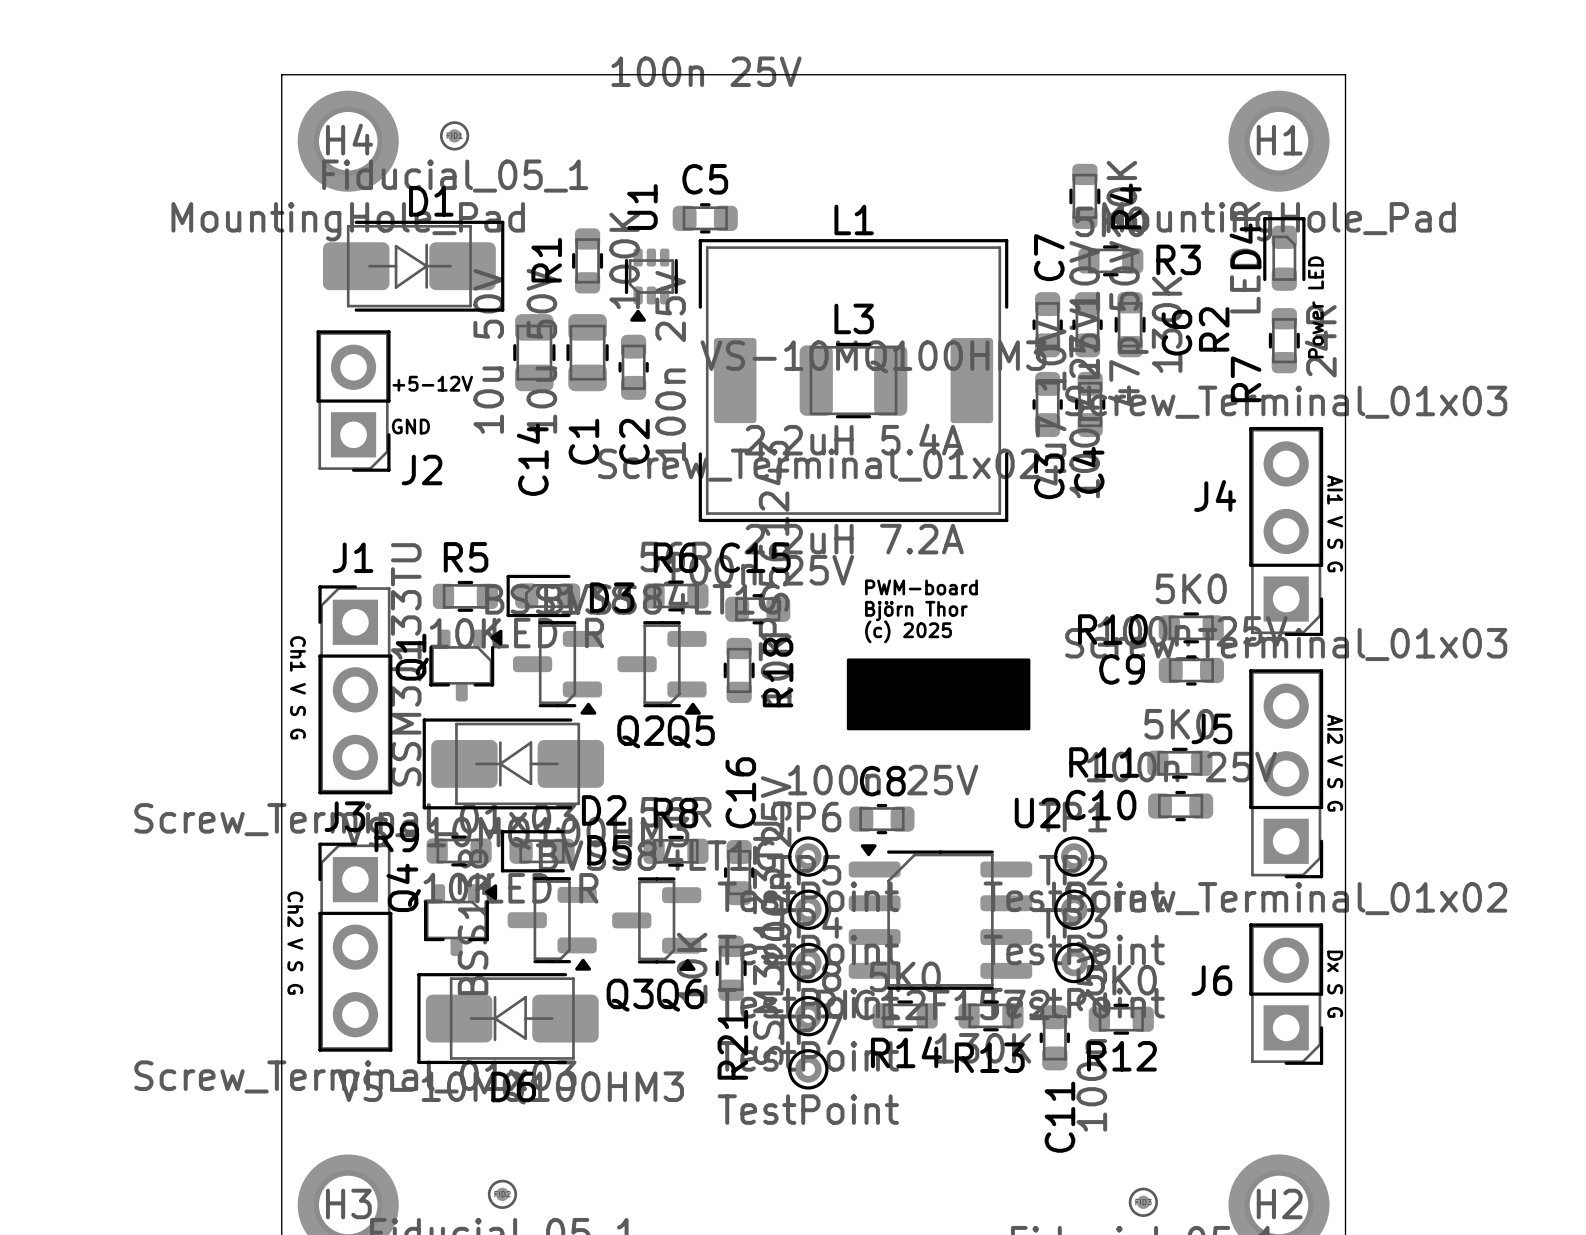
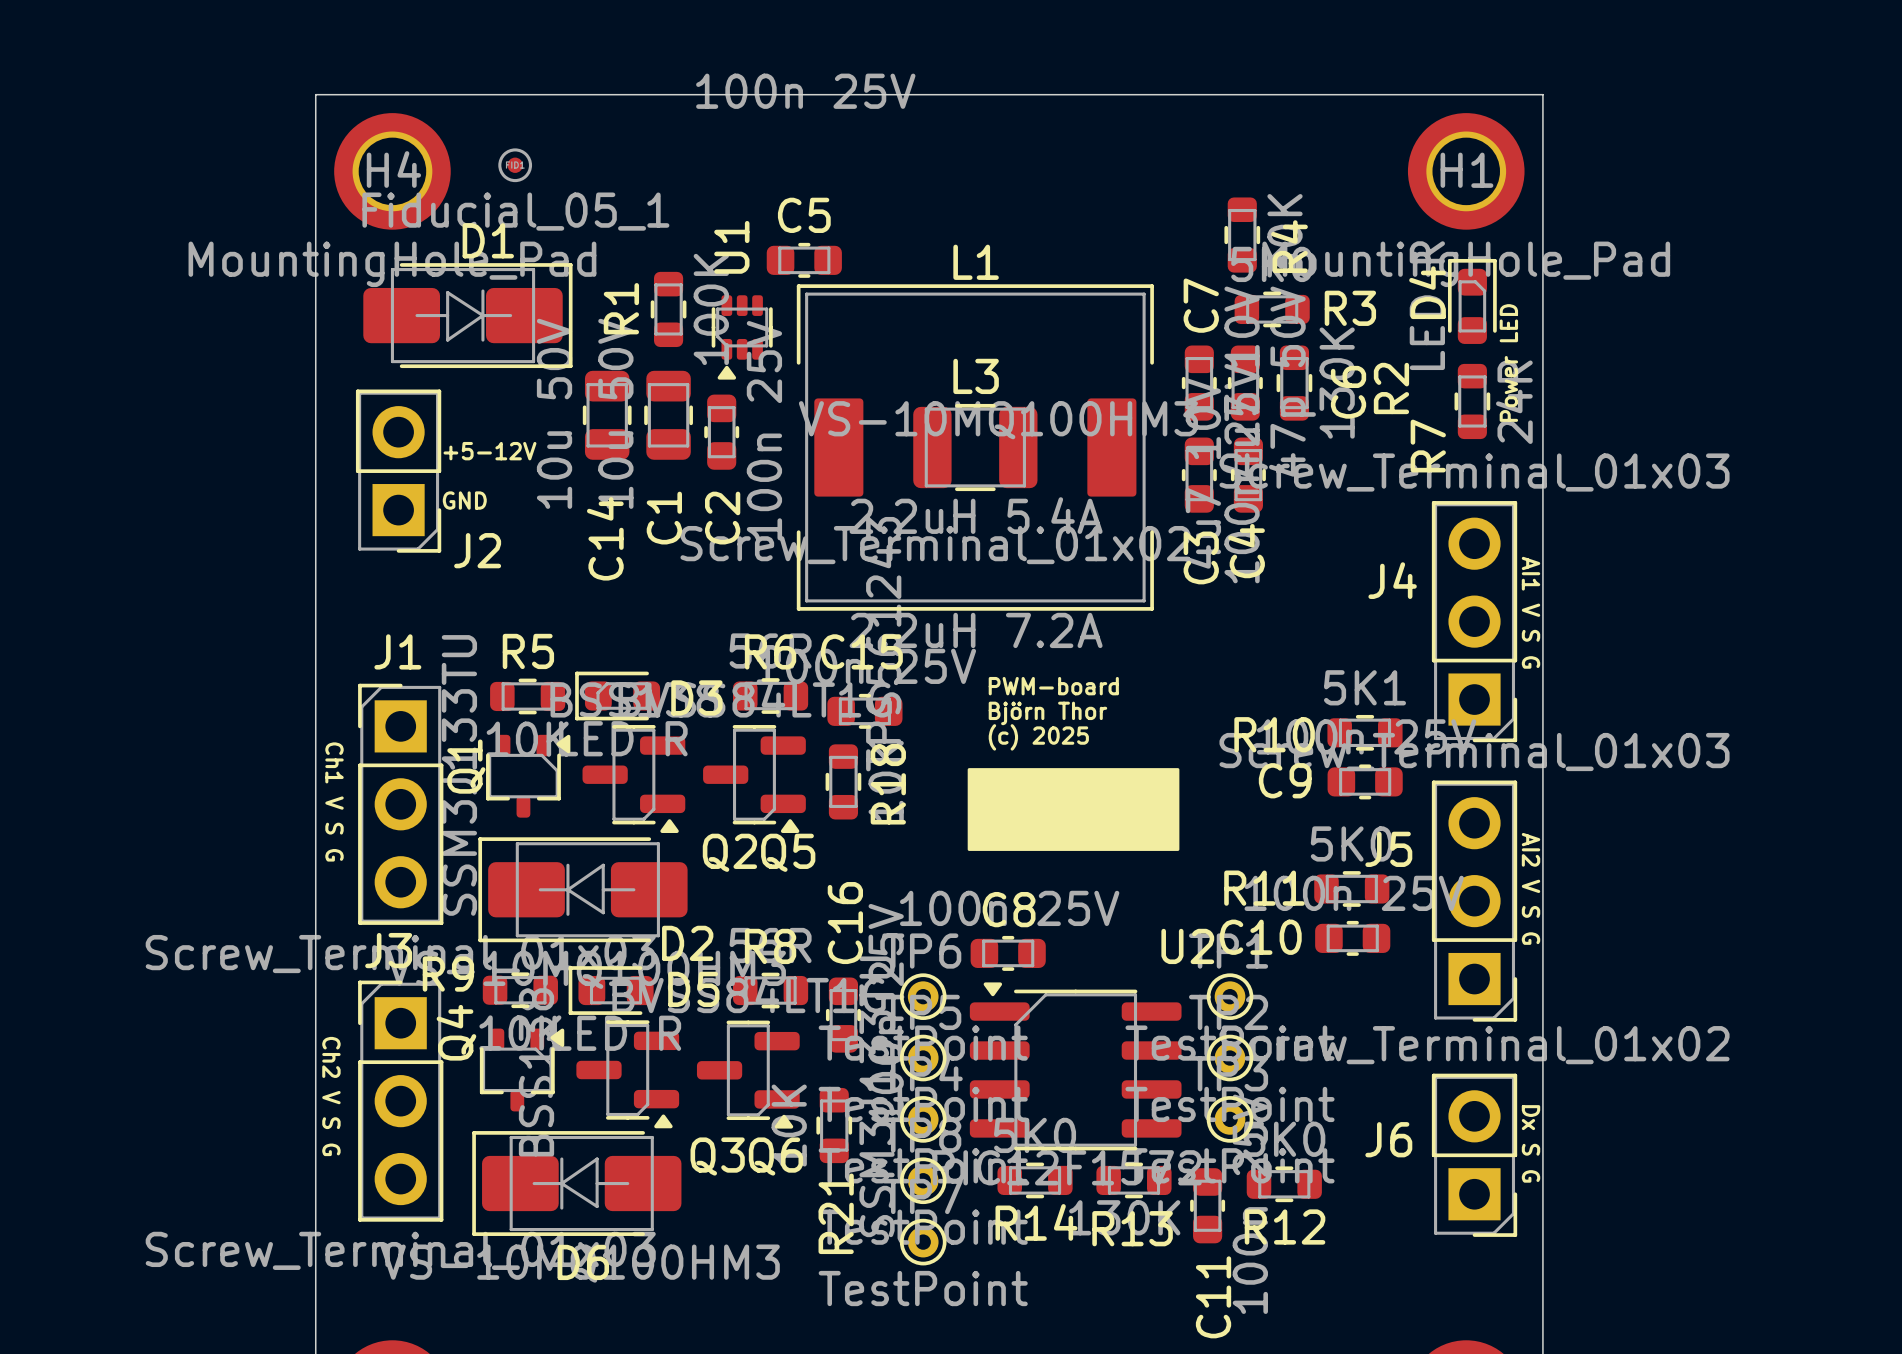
R10 value: 5K0 (1191, 588) -> 5K1 (1364, 687)

